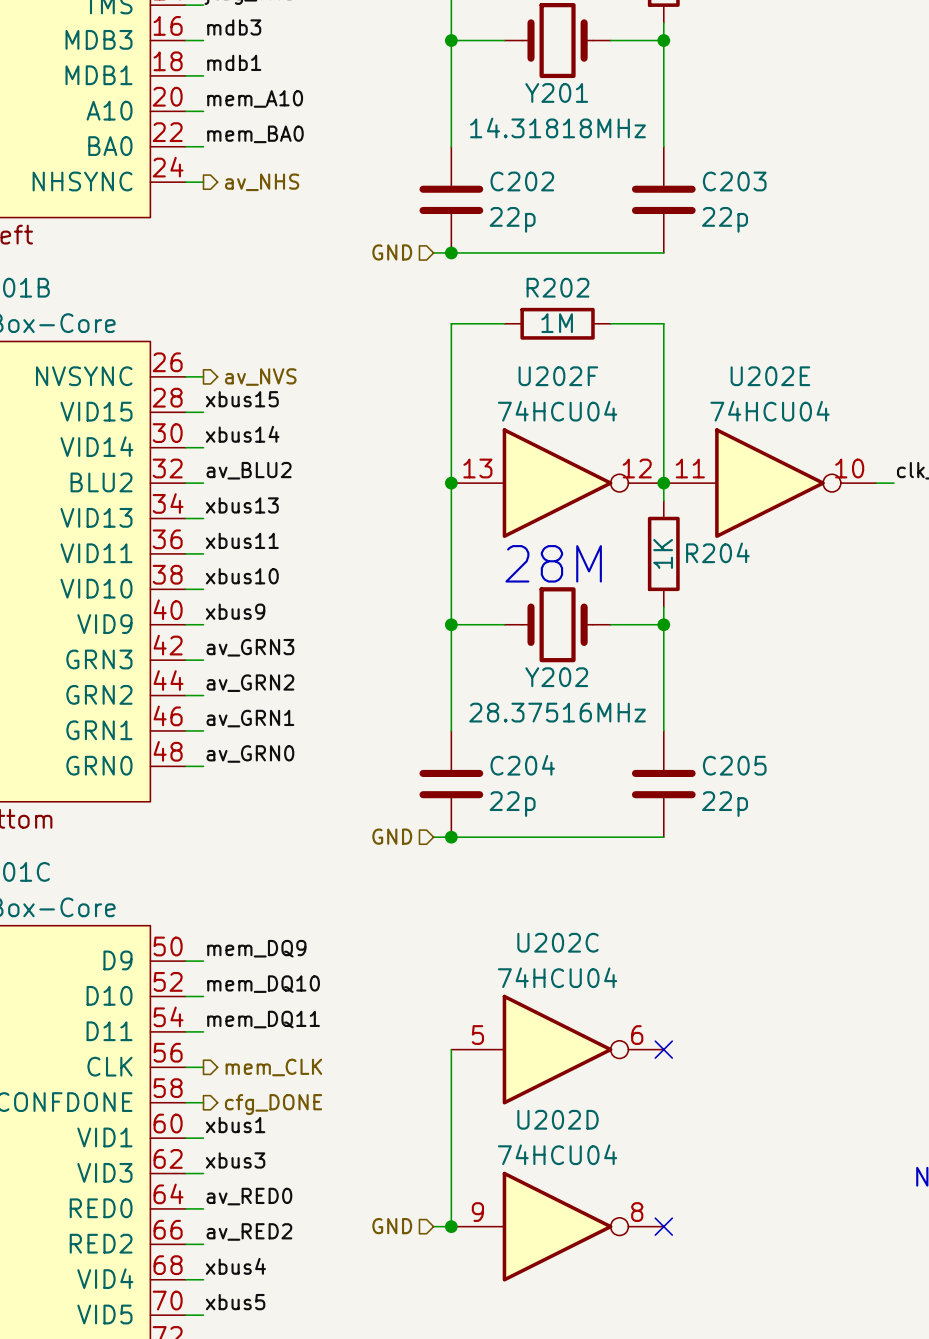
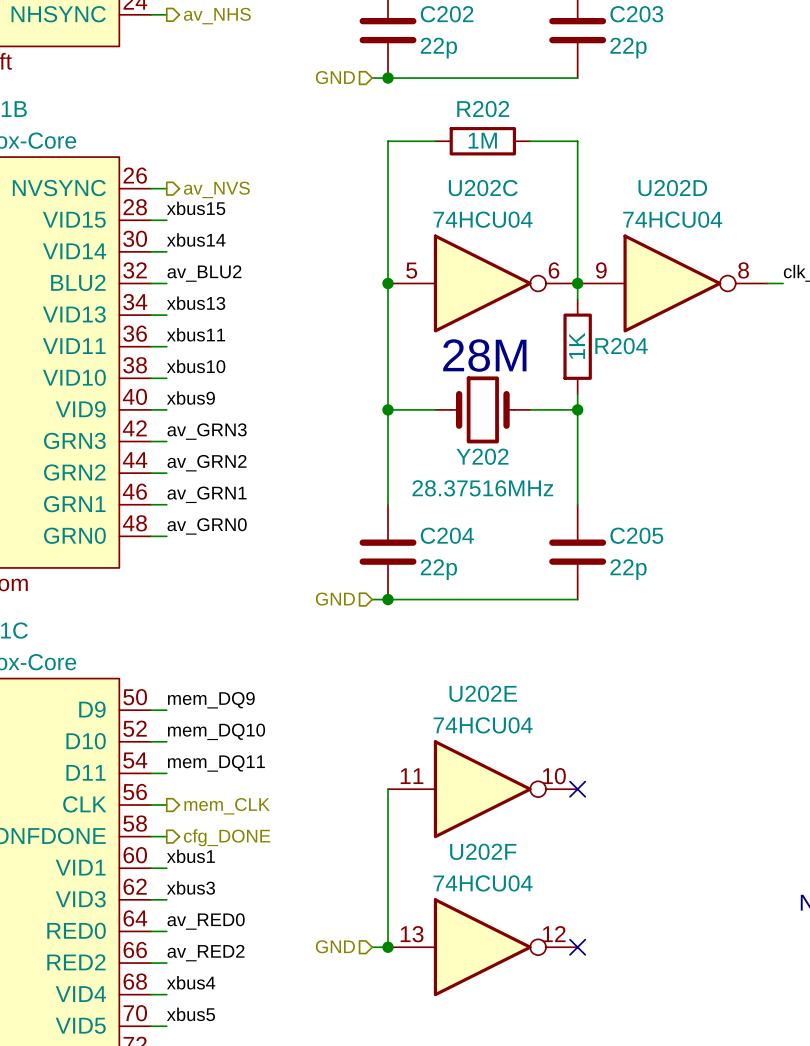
U202F position: (557, 483) -> (482, 947)
U202E position: (770, 483) -> (482, 789)
U202C position: (557, 1049) -> (482, 283)
U202D position: (557, 1226) -> (672, 283)

